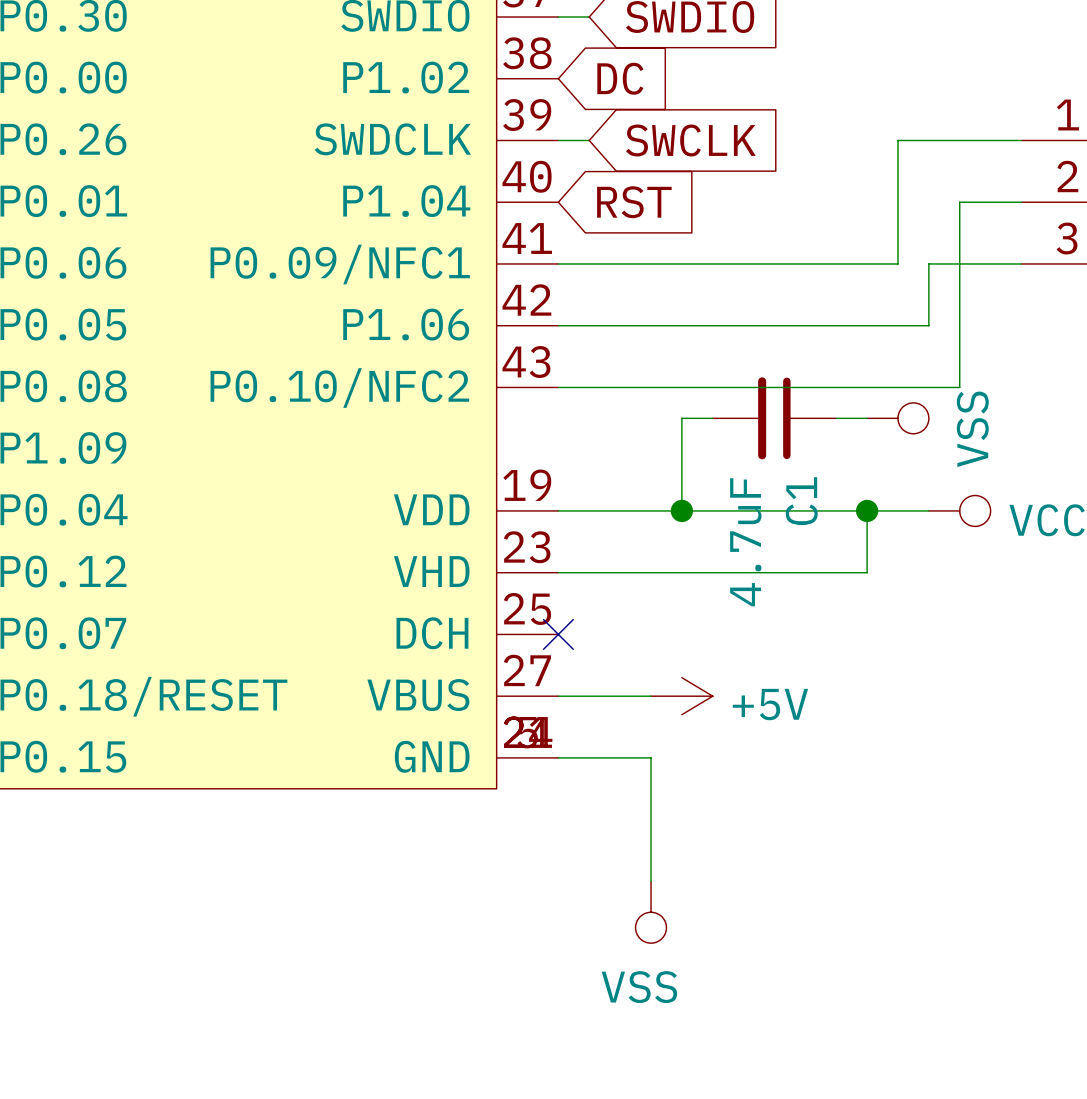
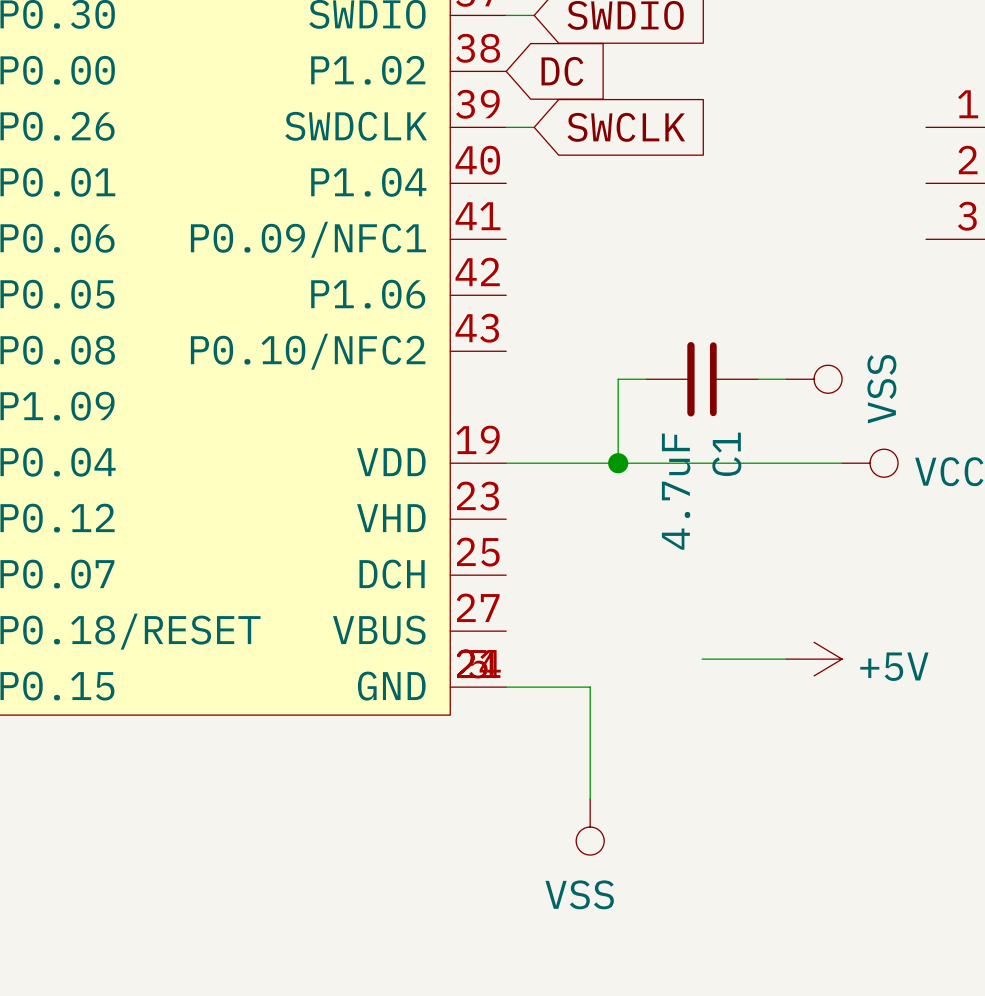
wire: (1021, 140) (897, 140) (897, 263) (558, 263) -> none
global label: RST (634, 202) -> none
wire: (1021, 202) (959, 202) (959, 387) (558, 387) -> none
wire: (1021, 263) (928, 263) (928, 325) (558, 325) -> none
wire: (867, 510) (867, 572) (558, 572) -> none
junction: (867, 510) -> none
no-connect mark: (558, 634) -> none
wire: (558, 696) (651, 696) -> (702, 659) (786, 659)
power symbol position: +5V (681, 696) -> +5V (814, 659)

